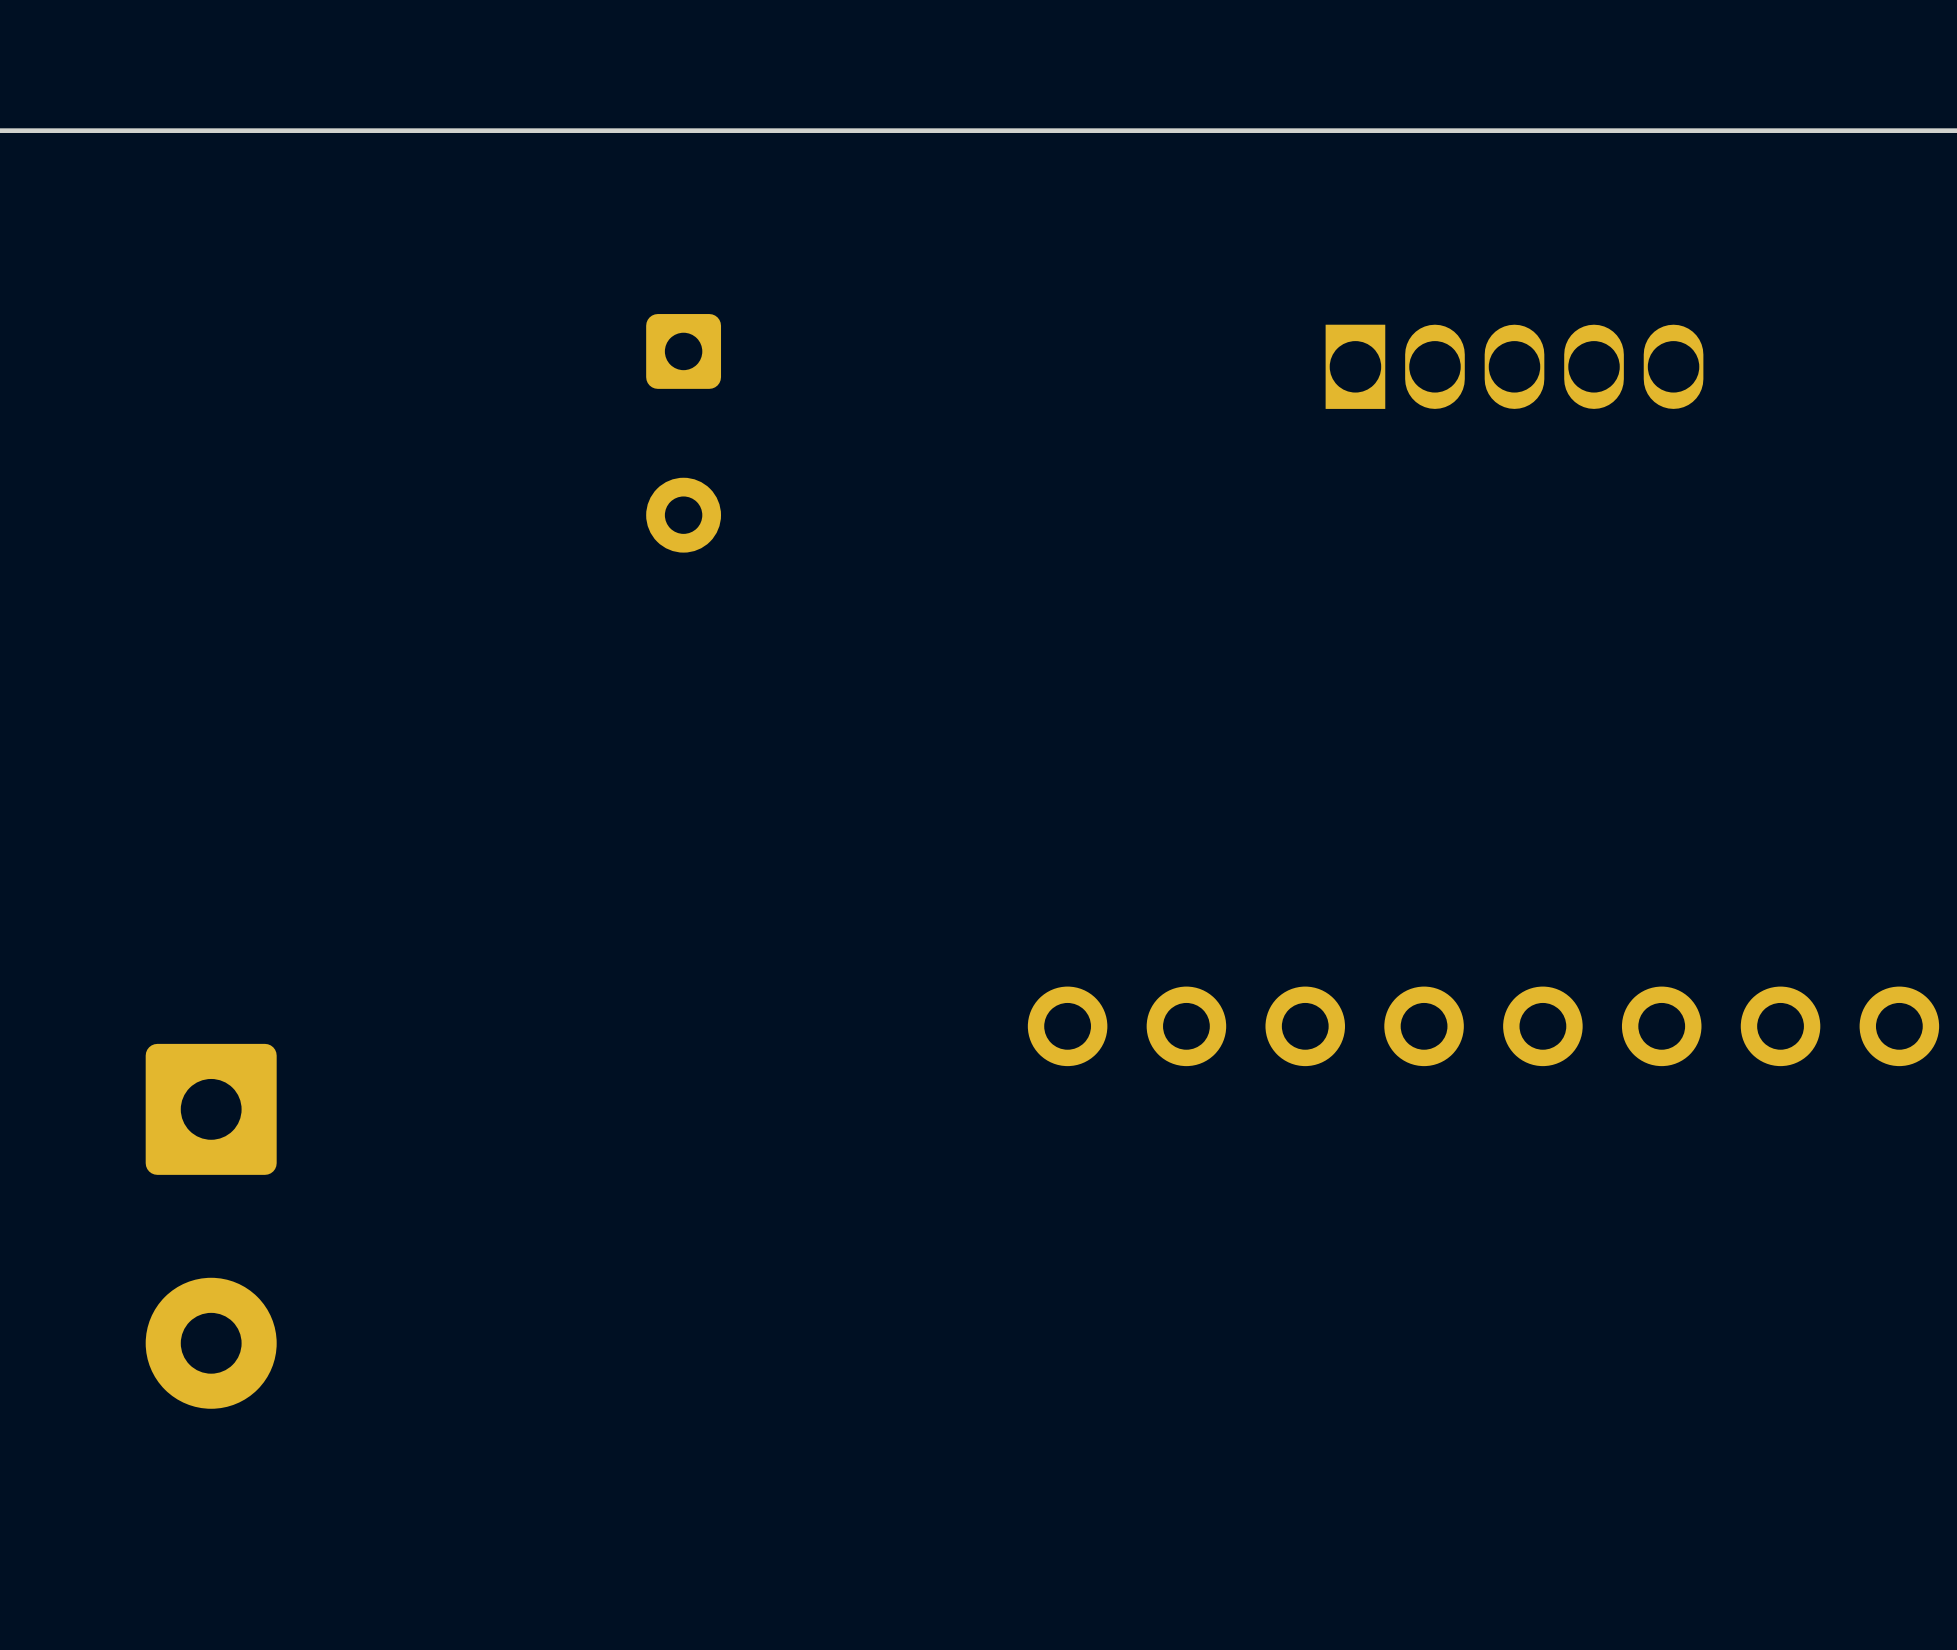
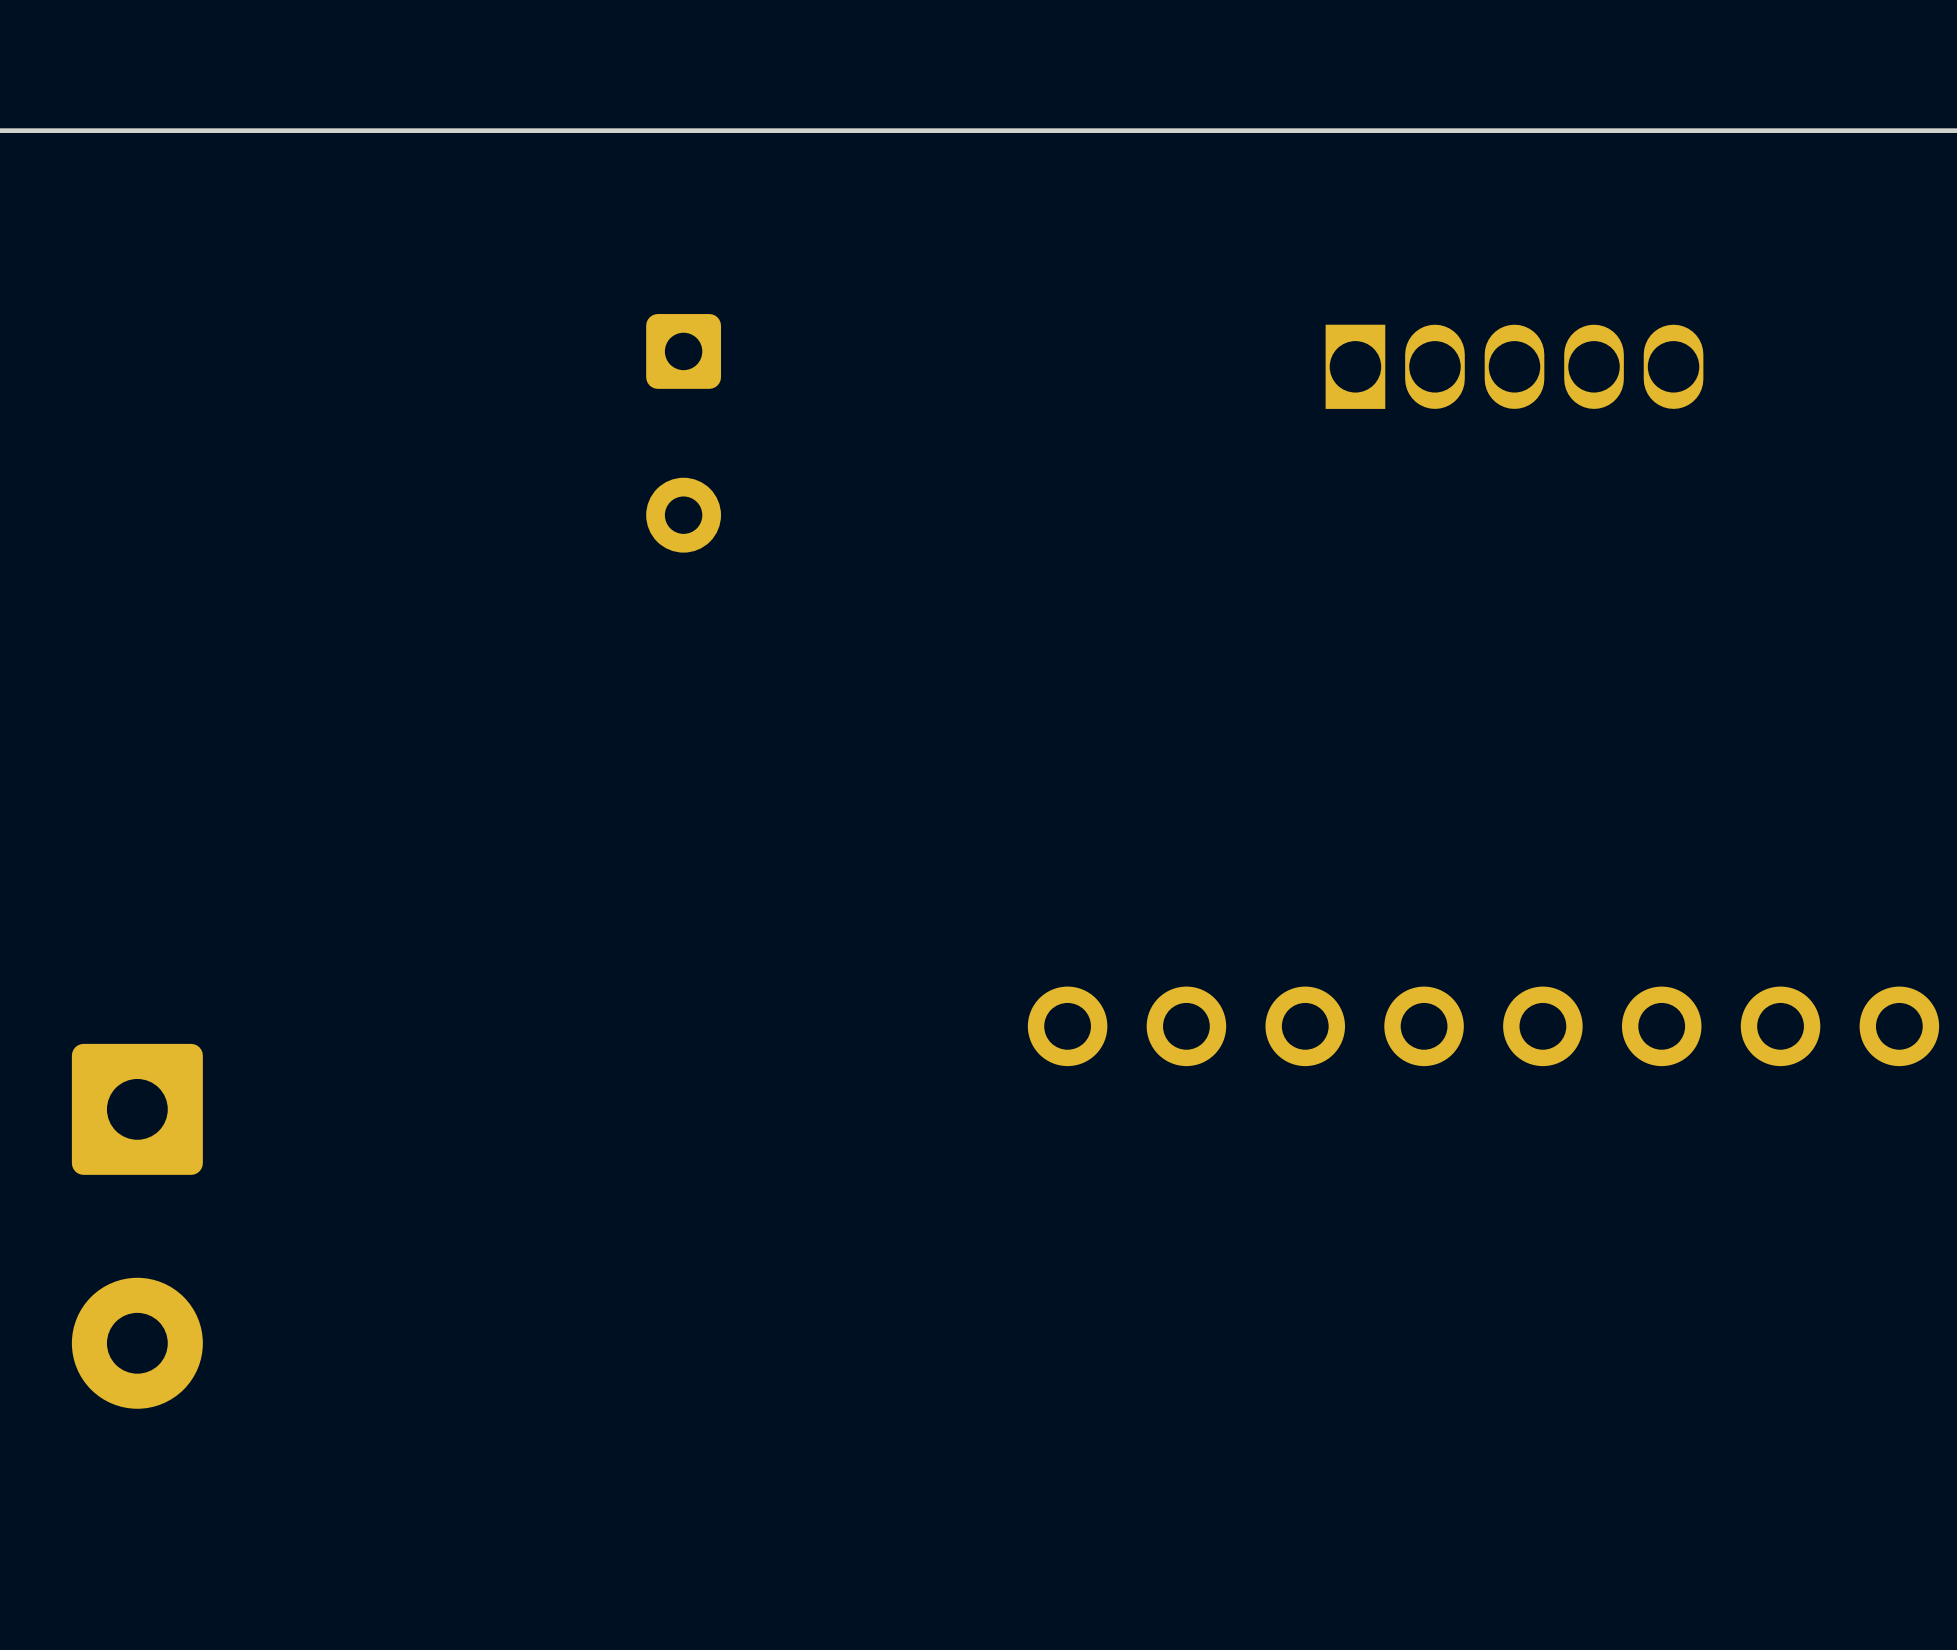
part position: (211, 1226) -> (137, 1226)

